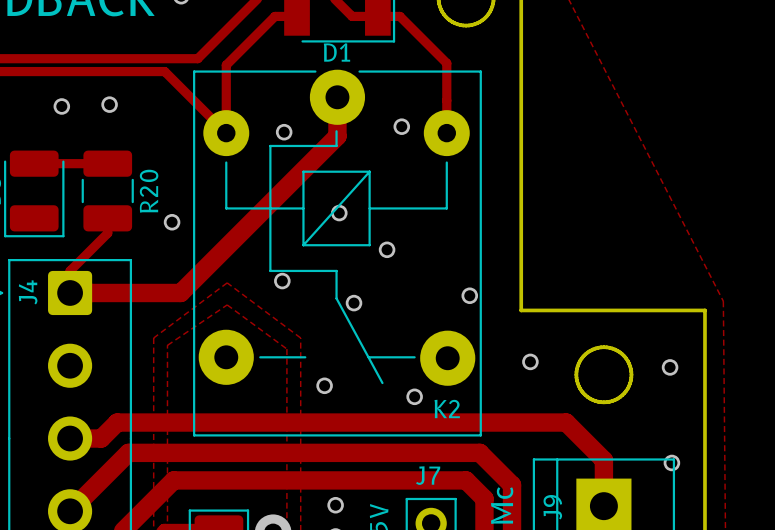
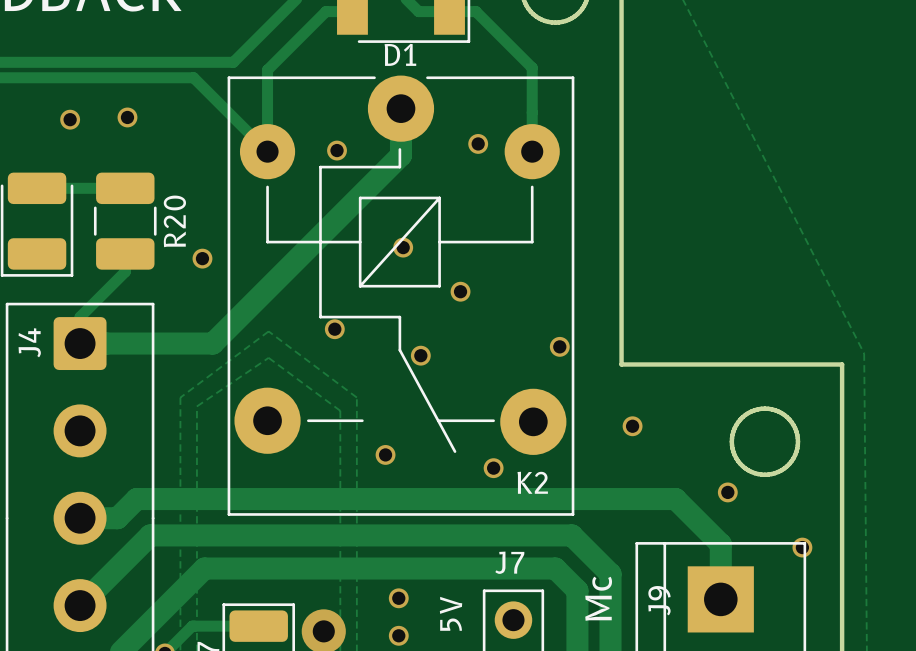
board edge: (603, 347) (615, 349) (624, 356) (630, 366) (631, 374) (629, 385) (622, 395) (612, 400) (603, 402) (595, 400) (585, 395) (578, 385) (576, 374) (578, 363) (585, 354) (595, 348) (603, 347) -> (764, 408) (778, 411) (789, 419) (796, 431) (798, 441) (795, 455) (787, 466) (775, 473) (764, 474) (754, 473) (742, 466) (734, 455) (731, 441) (734, 428) (742, 417) (754, 410) (764, 408)
via position: (670, 367) -> (727, 492)

